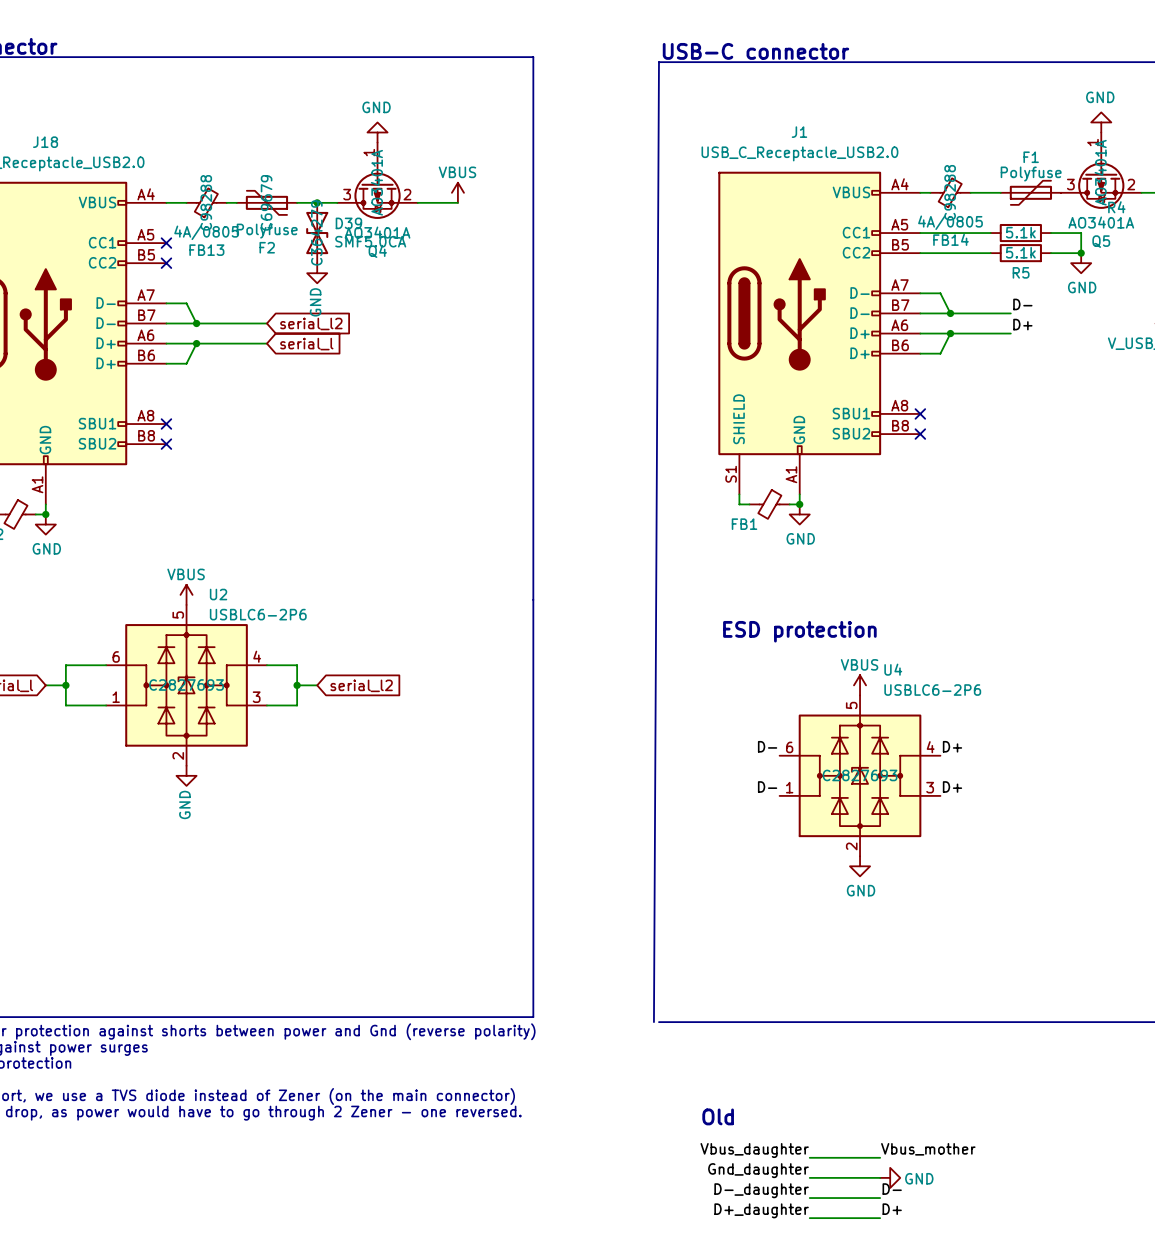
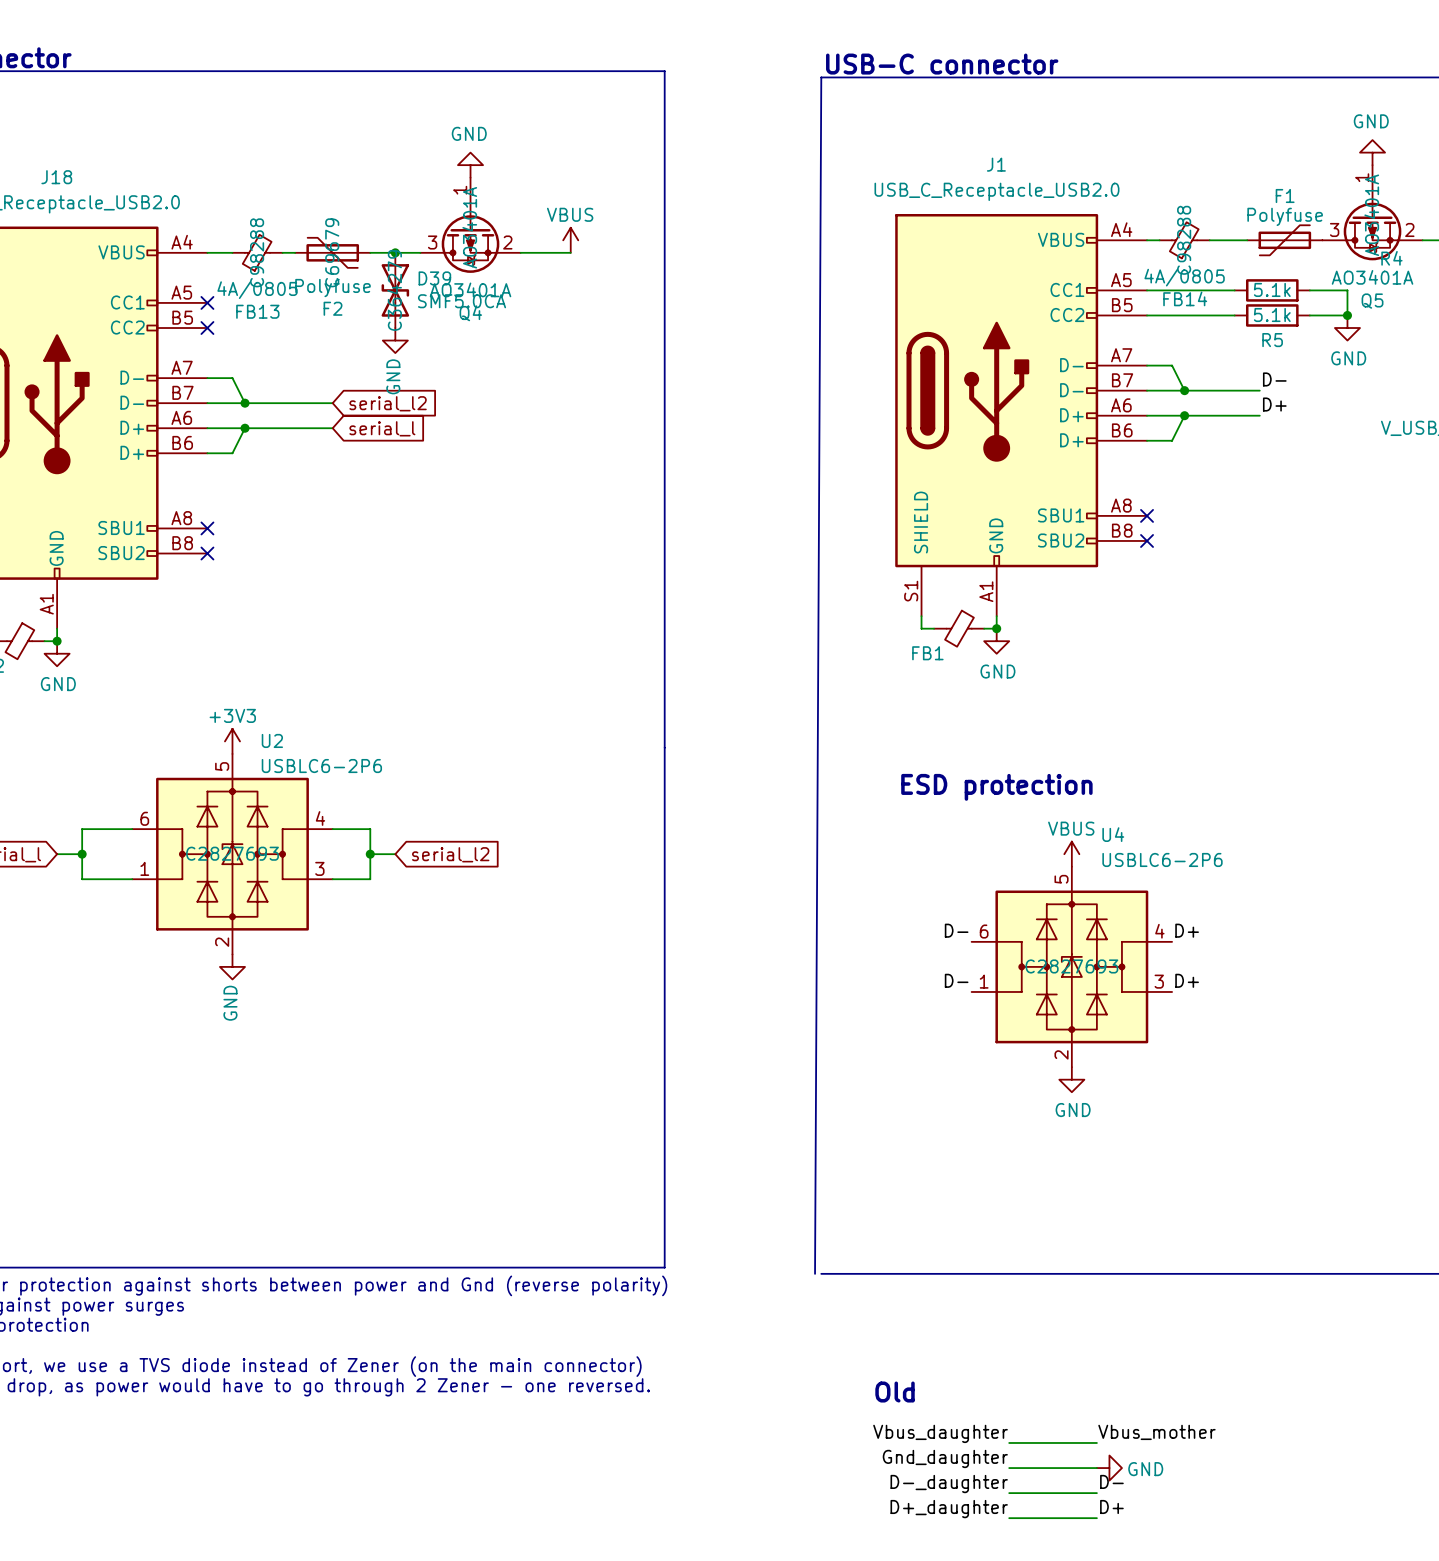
power symbol: VBUS (186, 594) -> +3V3 (232, 741)

